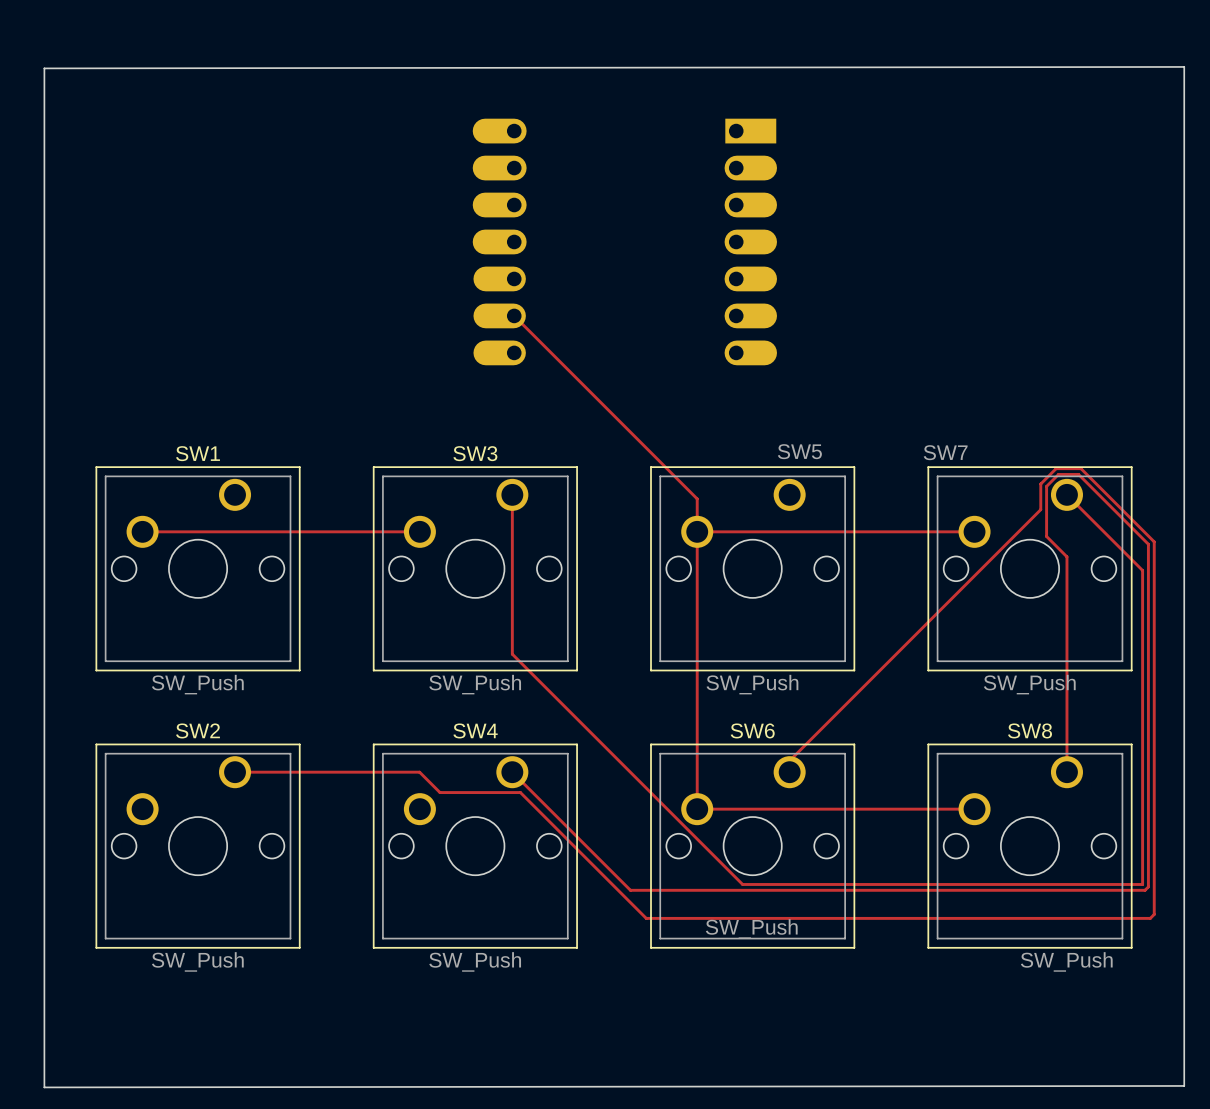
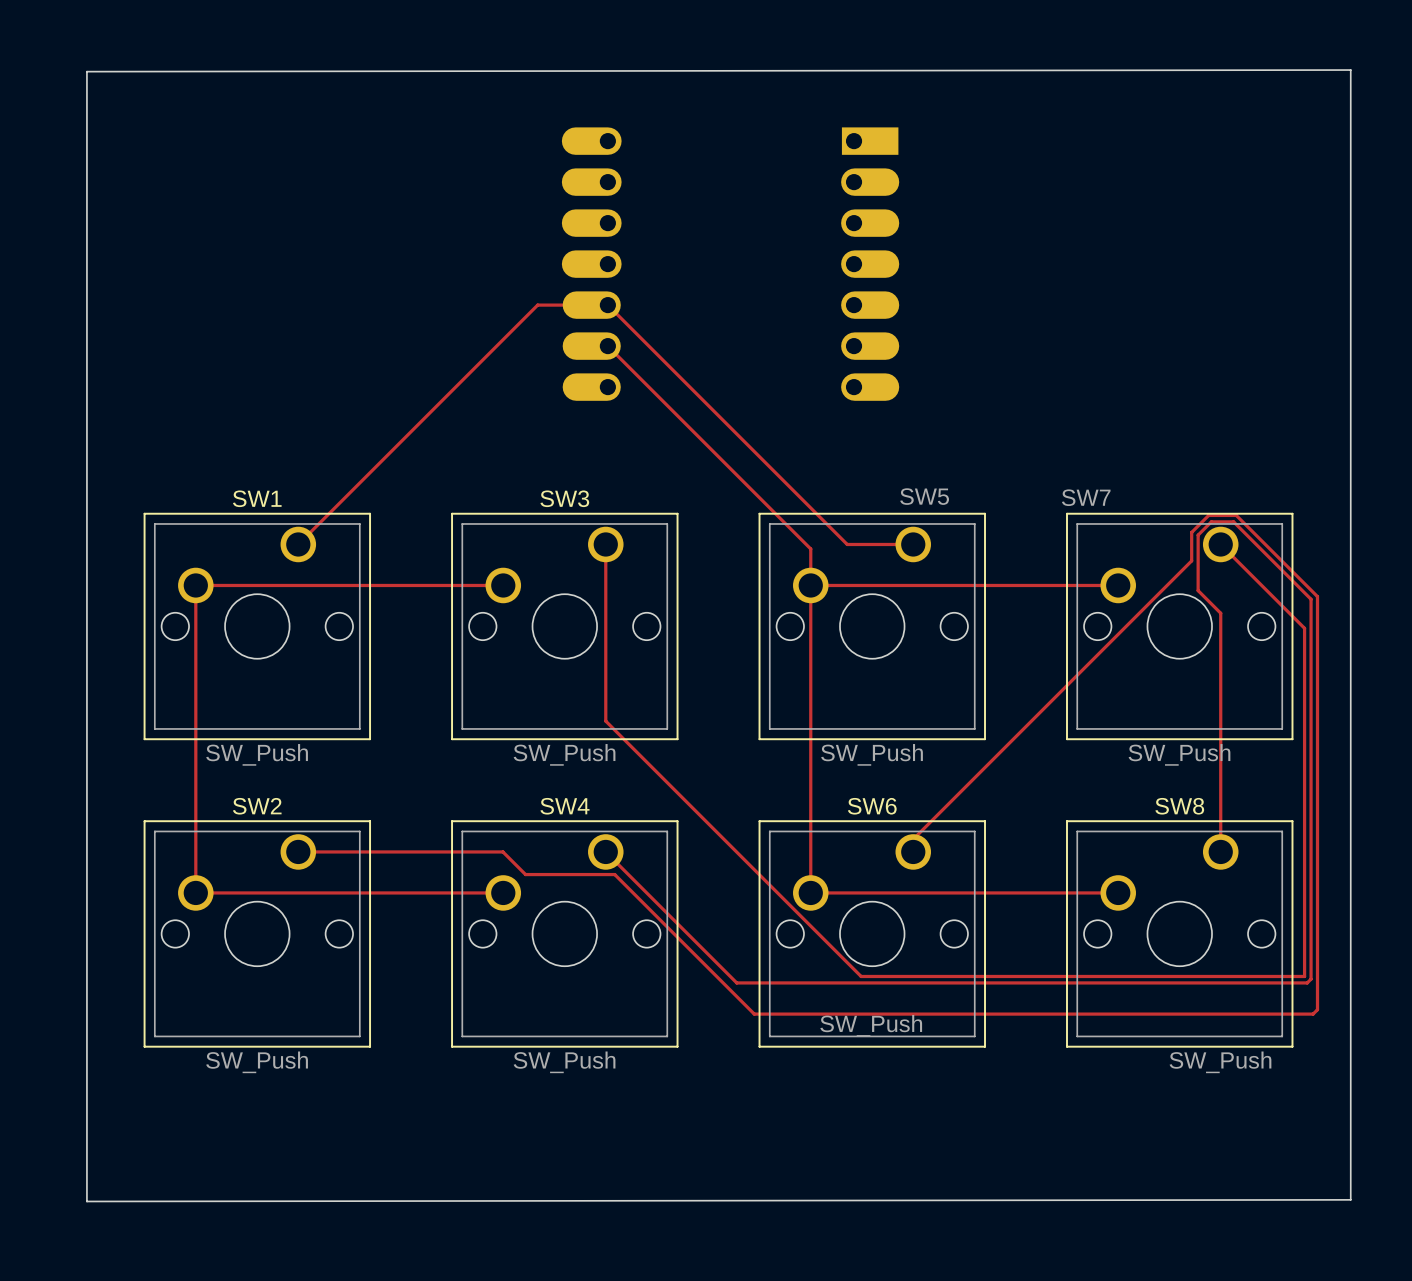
track: none -> (298, 544) (537, 305) (607, 305) (847, 544) (913, 544)
track: none -> (195, 585) (195, 892) (503, 892)

